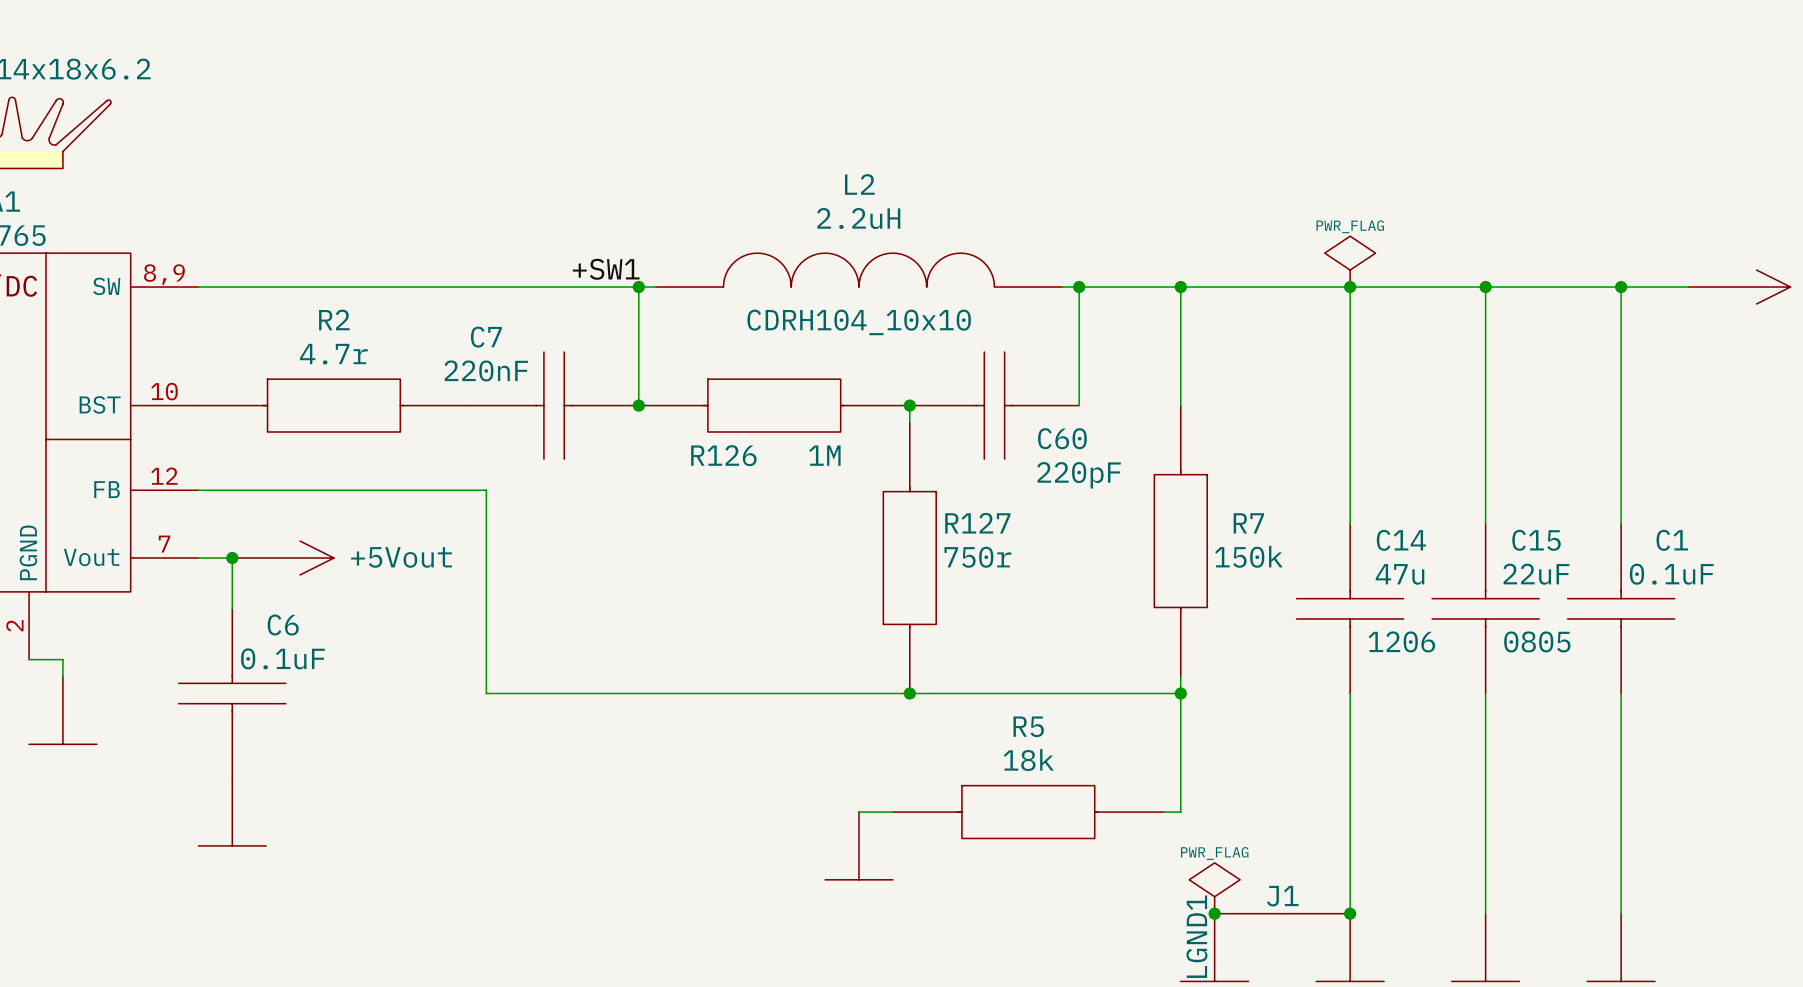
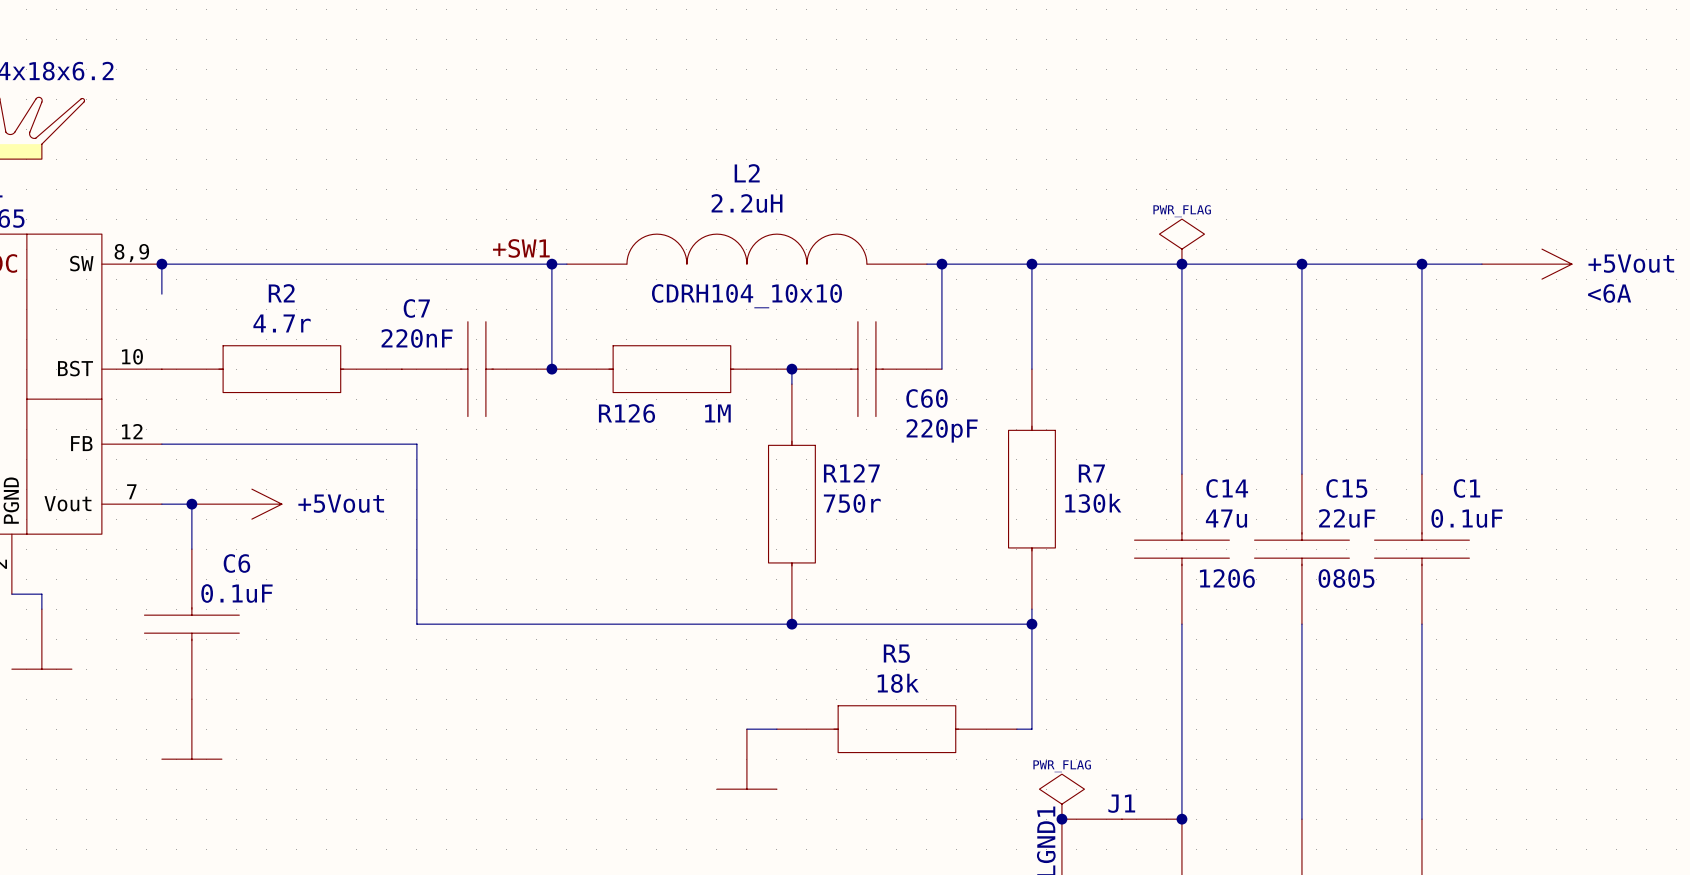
wire: none -> (161, 264) (161, 294)
junction: none -> (161, 264)
R7 value: 150k (1248, 556) -> 130k (1093, 503)

